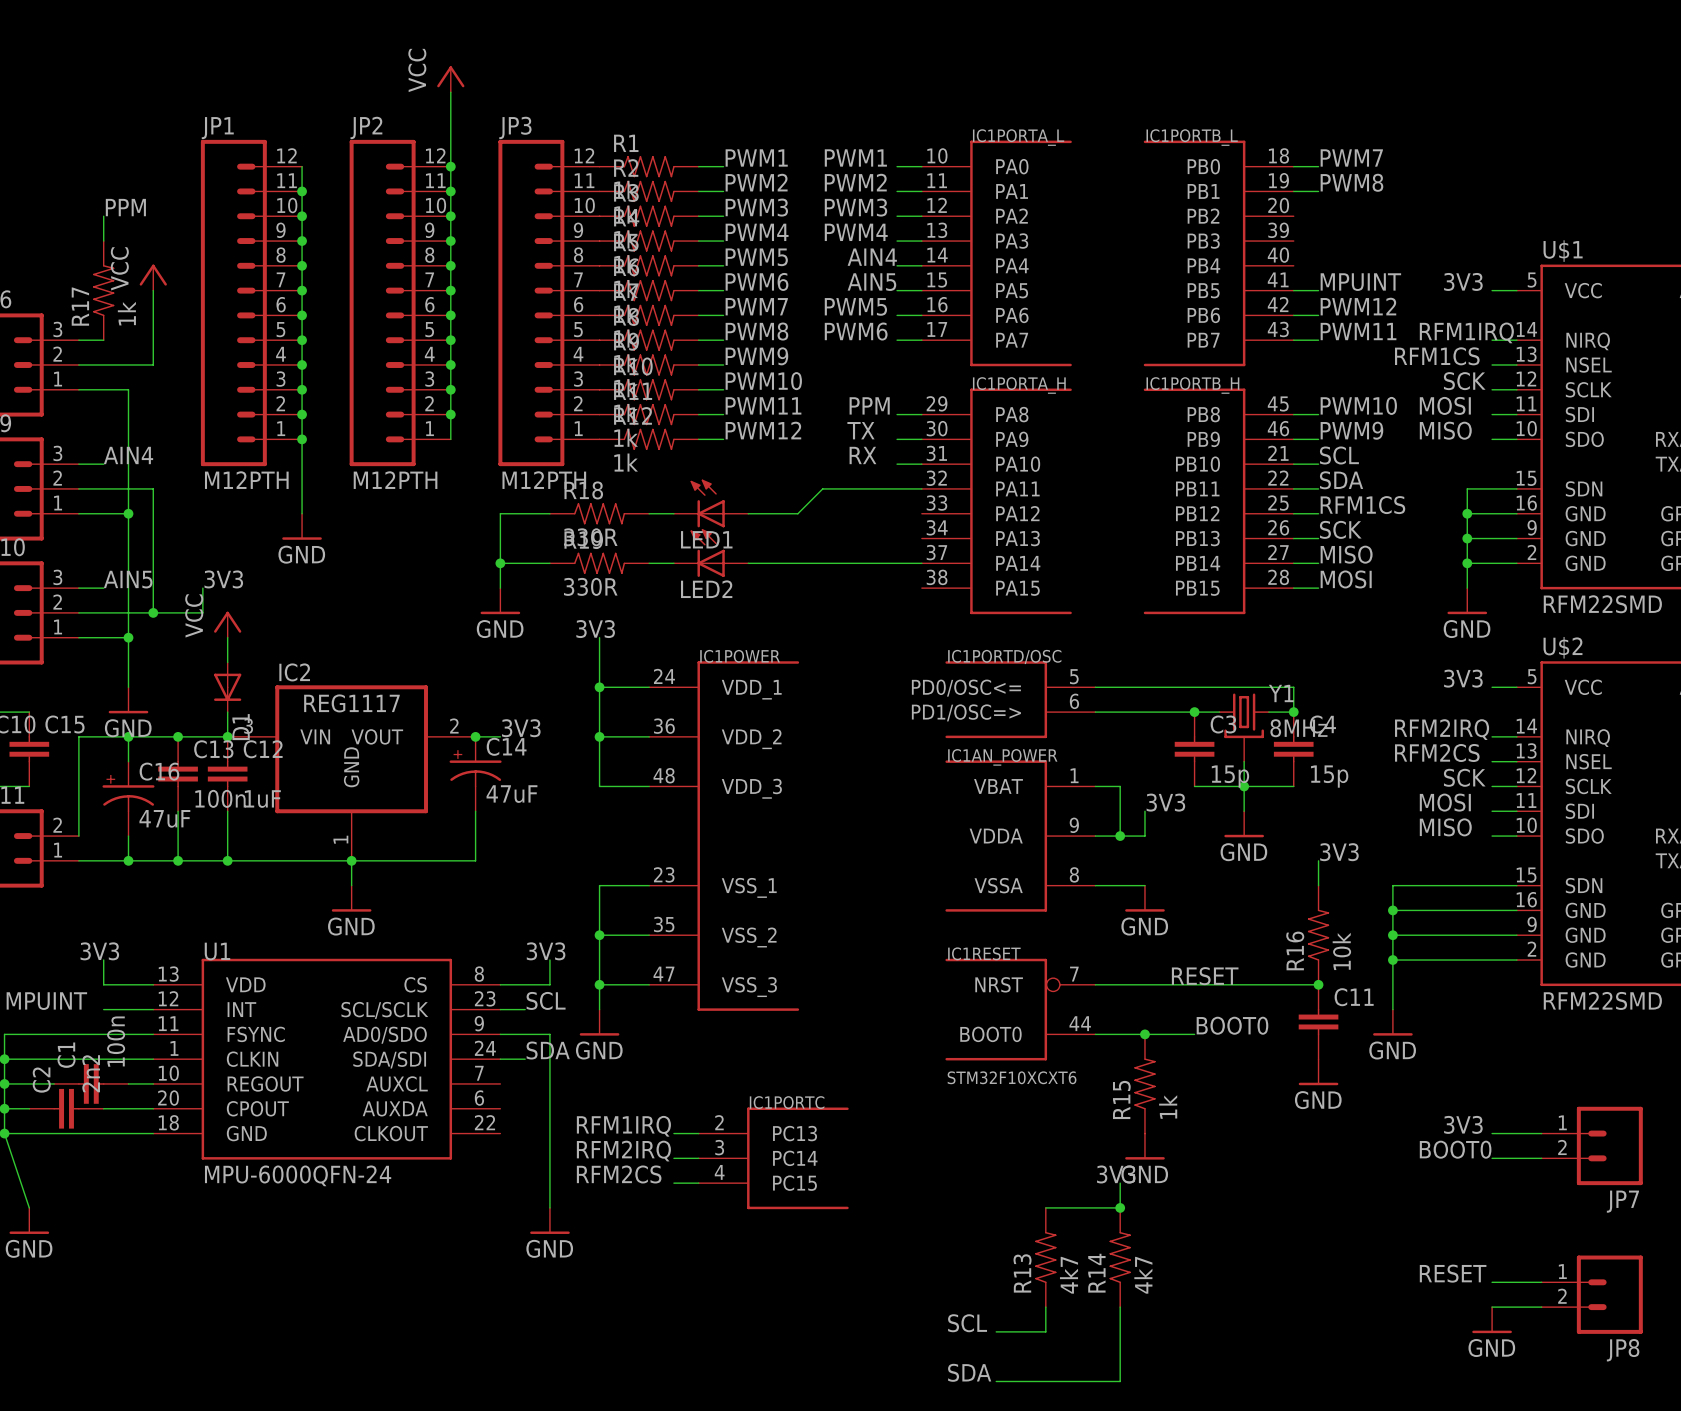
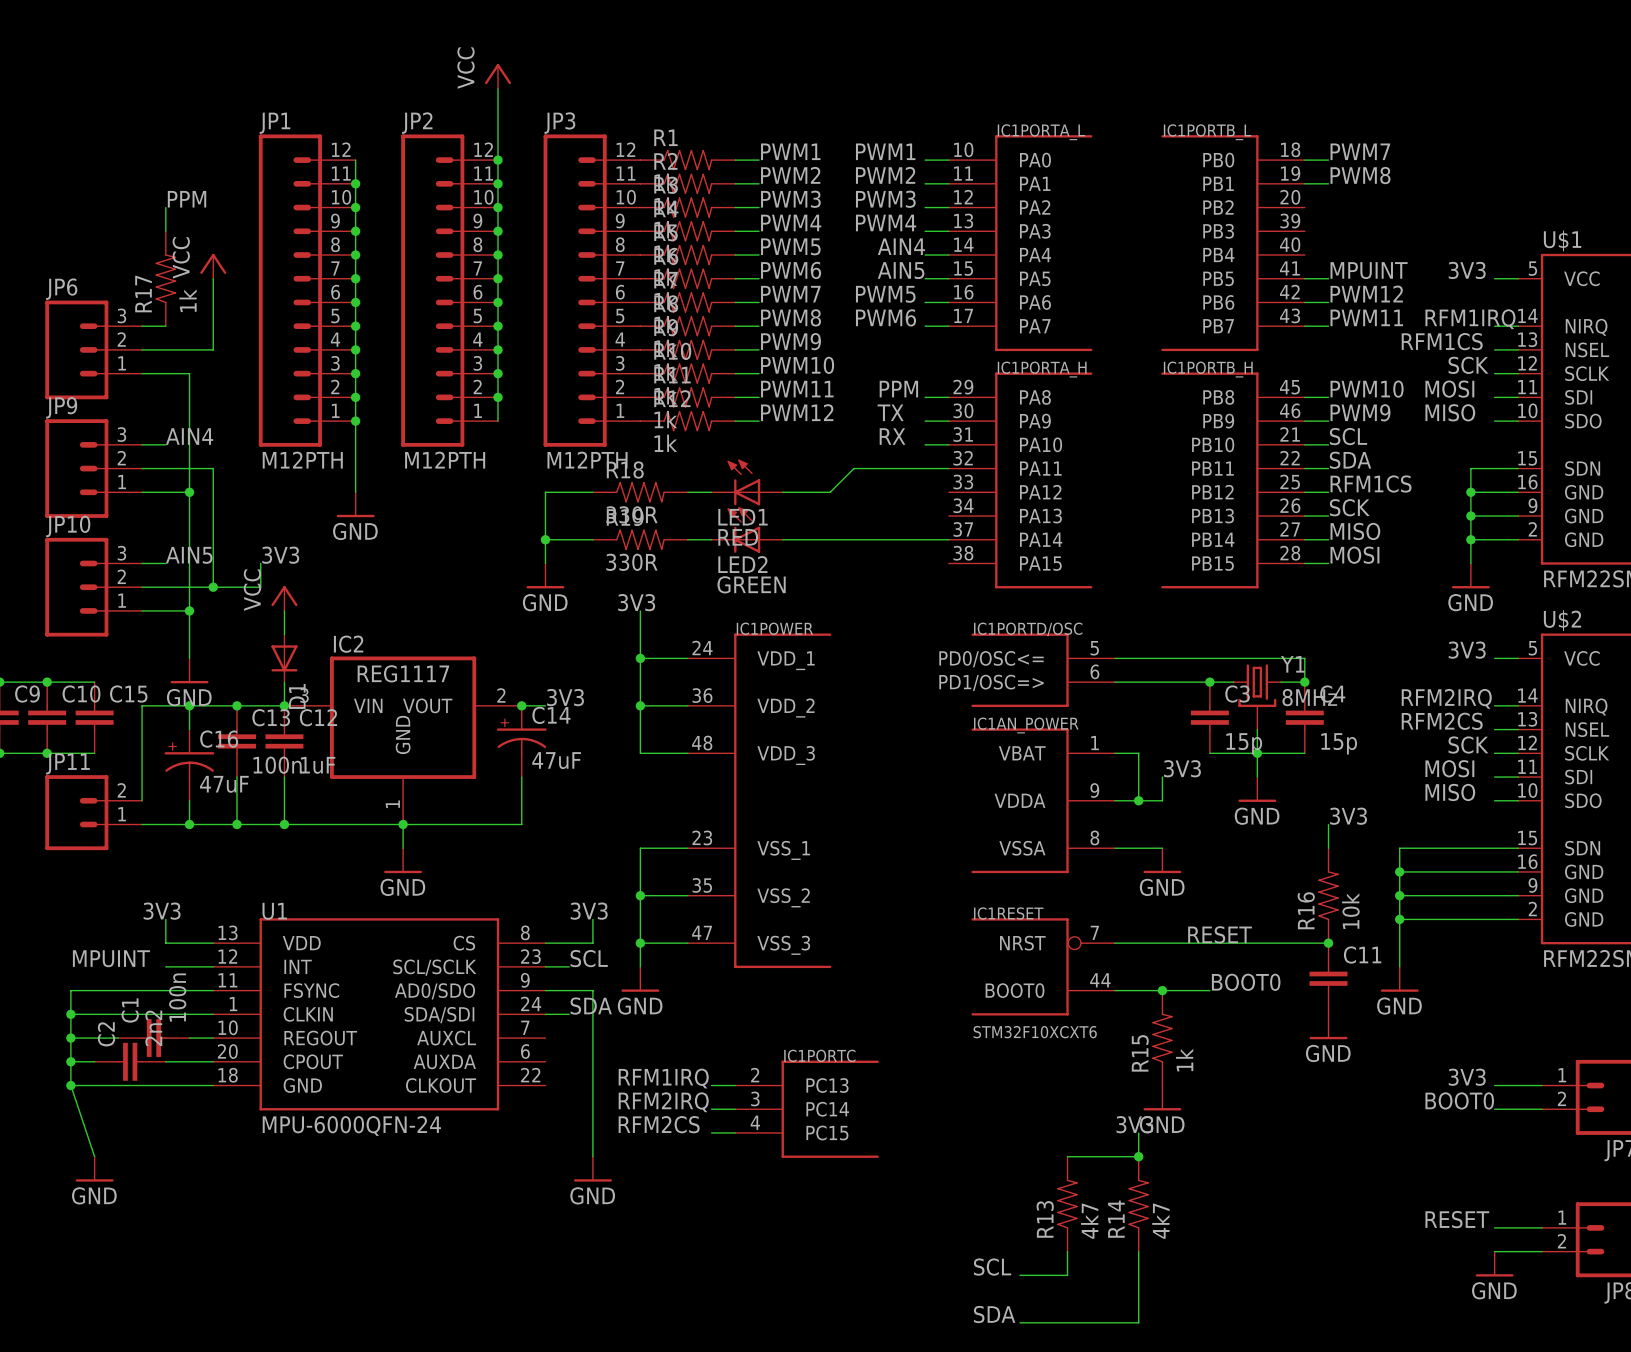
LED1 value: none -> RED (738, 537)
LED2 value: none -> GREEN (751, 584)

